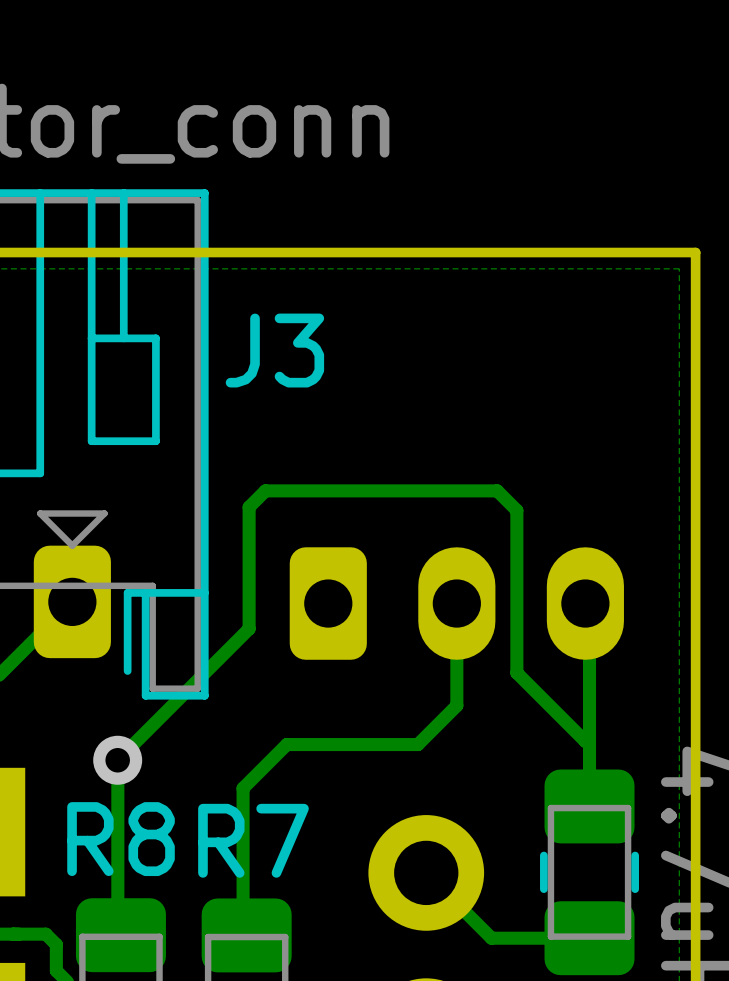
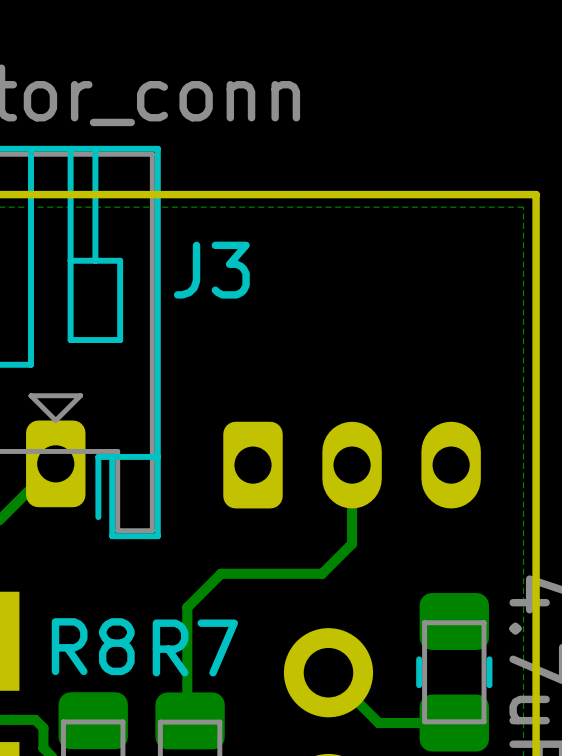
track: (589, 607) (589, 806) -> none
track: (589, 741) (585, 741) (516, 672) (516, 510) (497, 490) (265, 490) (249, 507) (249, 628) (117, 760) -> none
track: (117, 760) (117, 932) -> none
via: (117, 760) -> none

